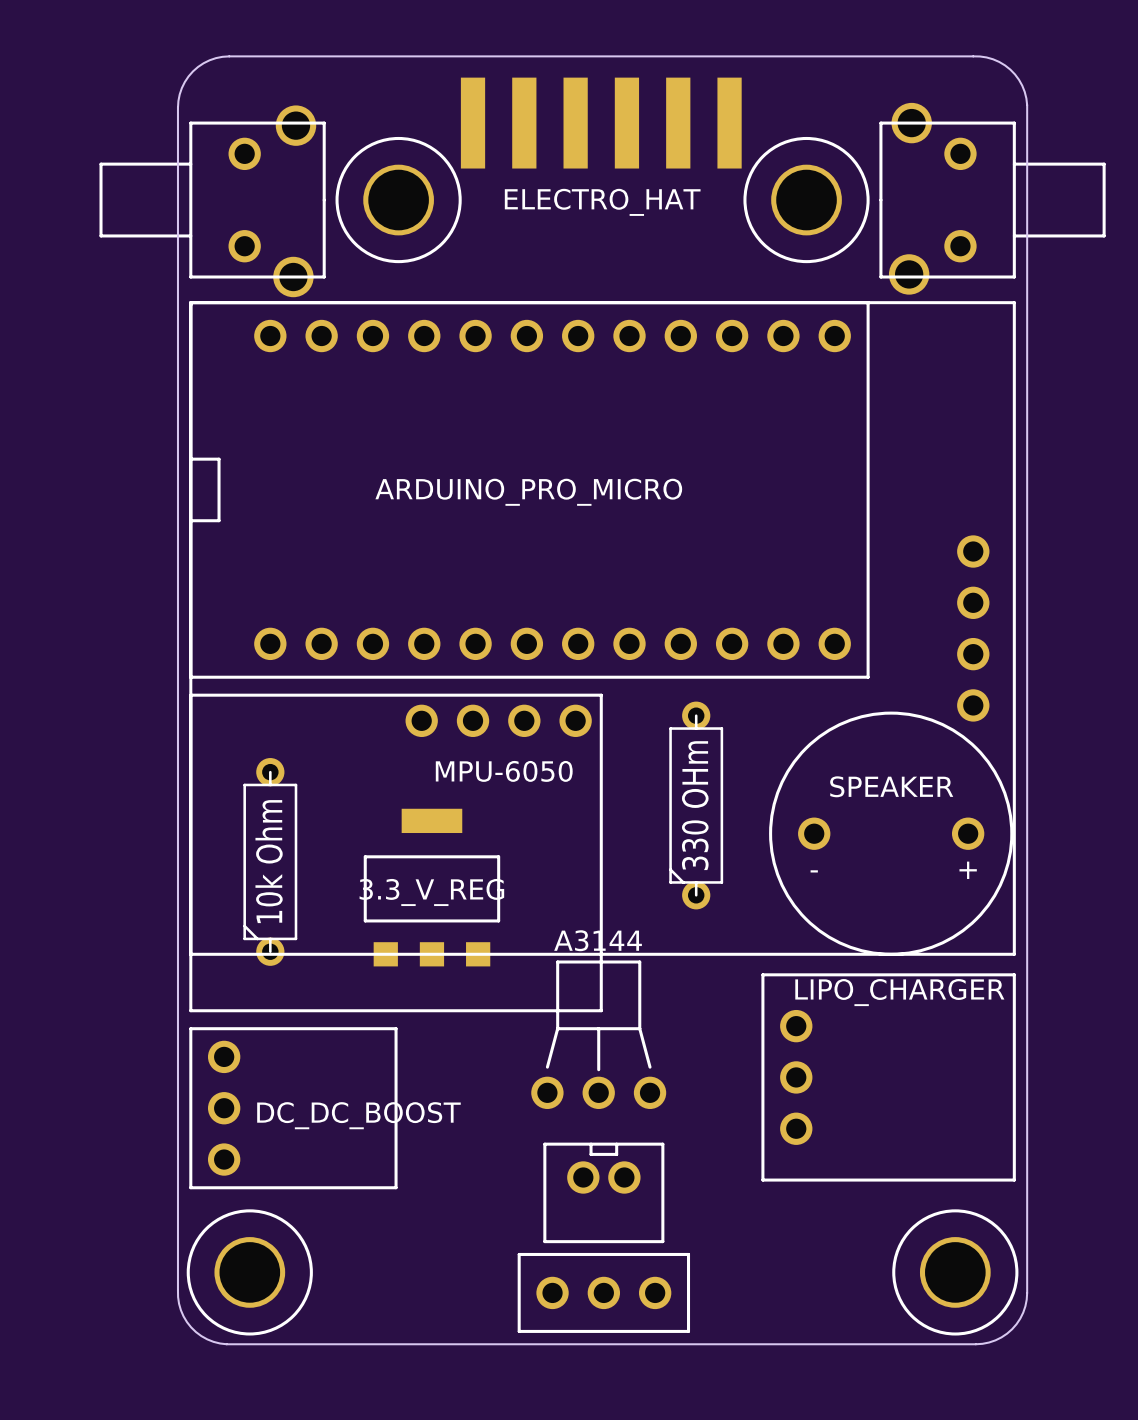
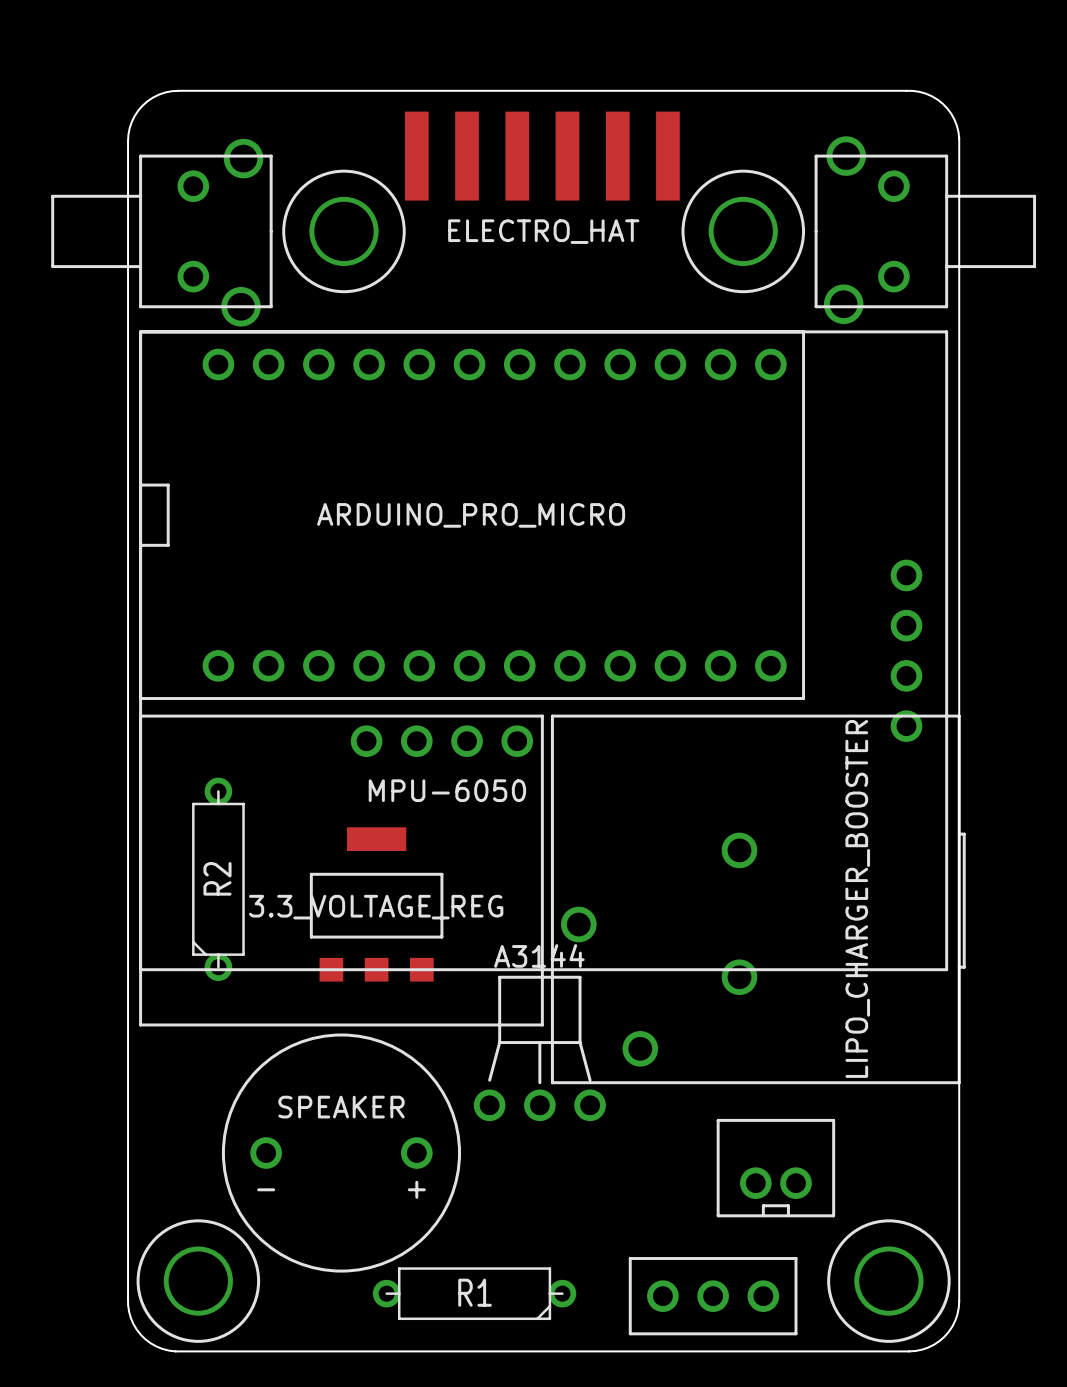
330 OHm: (696, 805) -> none
part: SPEAKER (891, 833) -> none
10k Ohm name: 10k Ohm (269, 861) -> R2 (217, 878)
part: none -> LIPO_CHARGER_BOOSTER (758, 899)
part value: 3.3_V_REG (431, 892) -> 3.3_VOLTAGE_REG (376, 907)
part: LIPO_CHARGER (888, 1077) -> none
part: DC_DC_BOOST (293, 1108) -> none
part: none -> SPEAKER (341, 1153)
part rotation: 0° (603, 1192) -> 180° (775, 1168)
part position: (603, 1192) -> (775, 1168)
R1: none -> (474, 1293)
part position: (603, 1292) -> (713, 1296)

